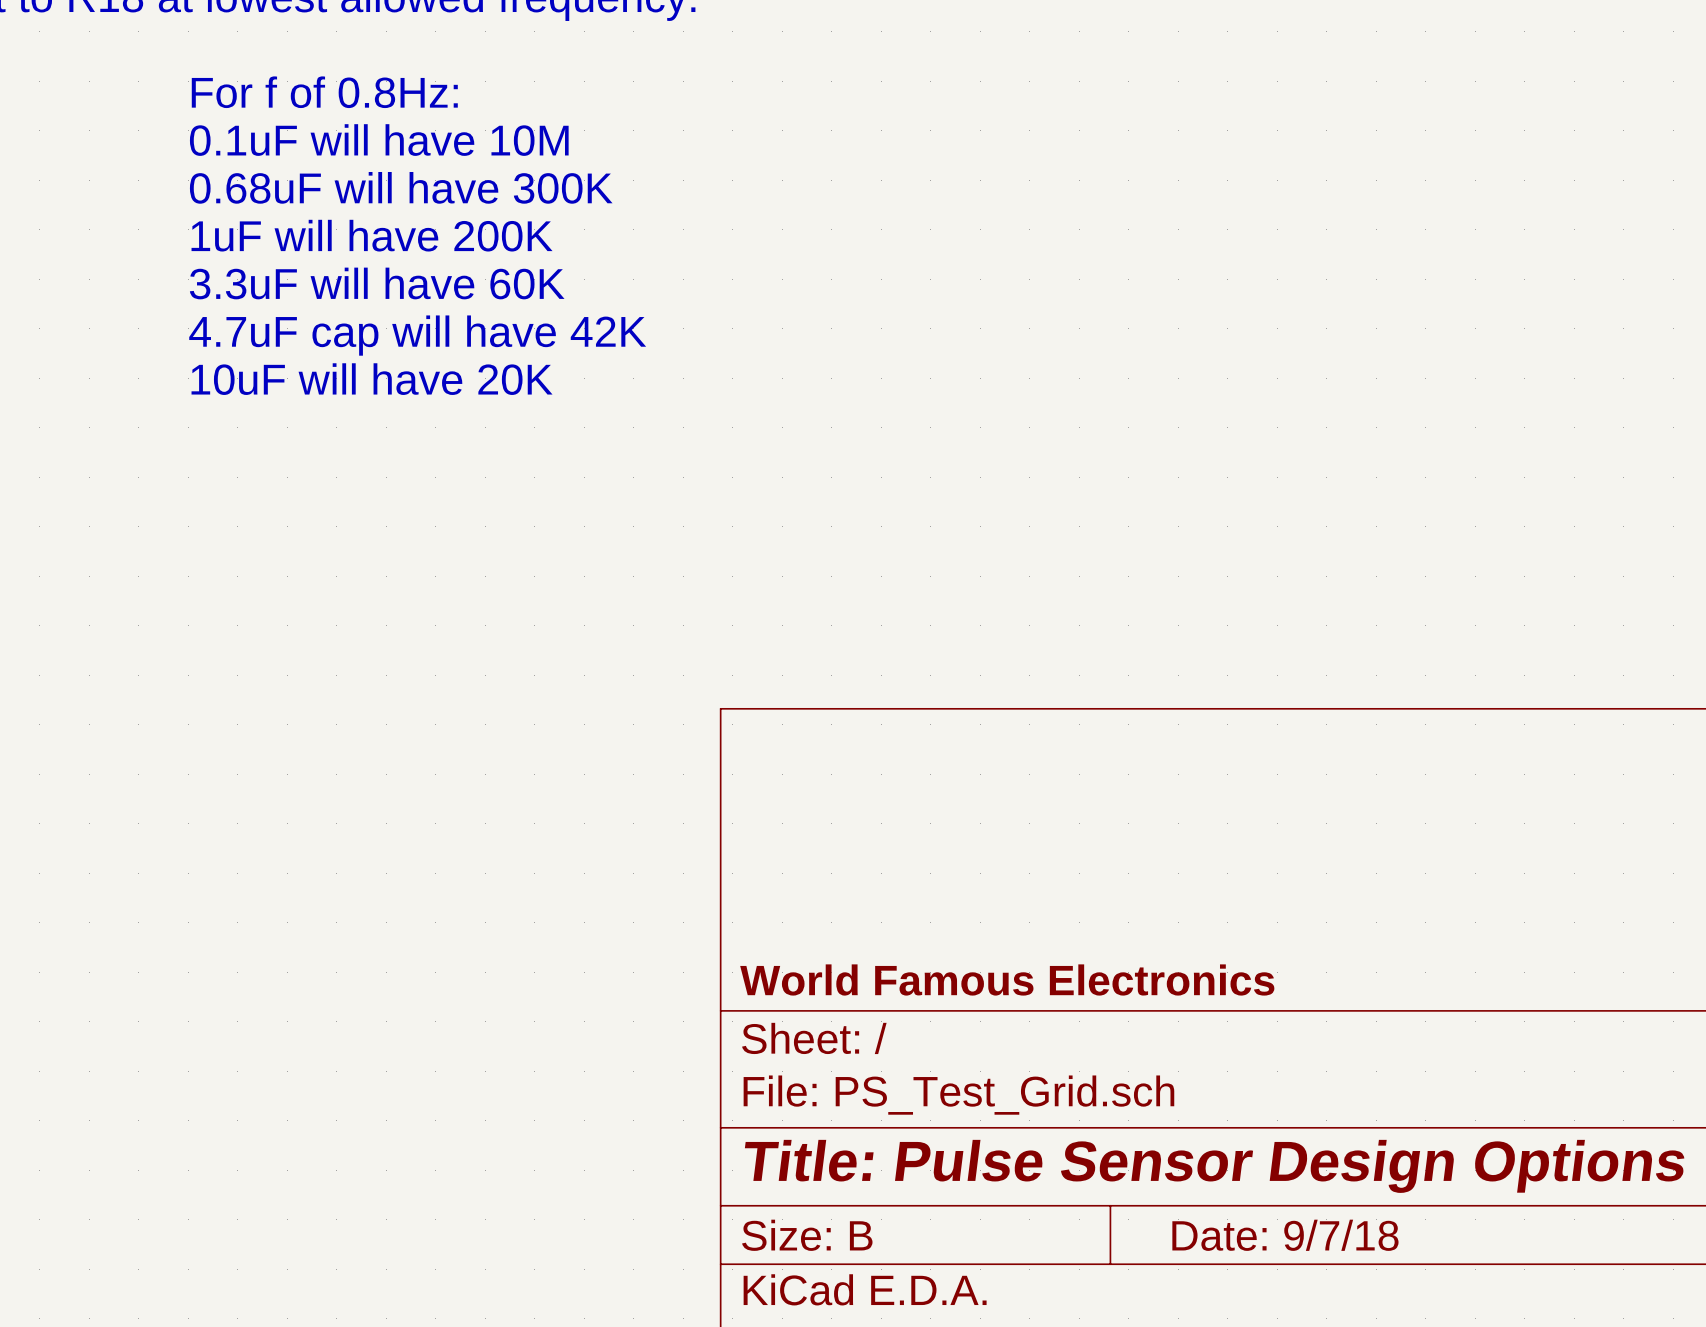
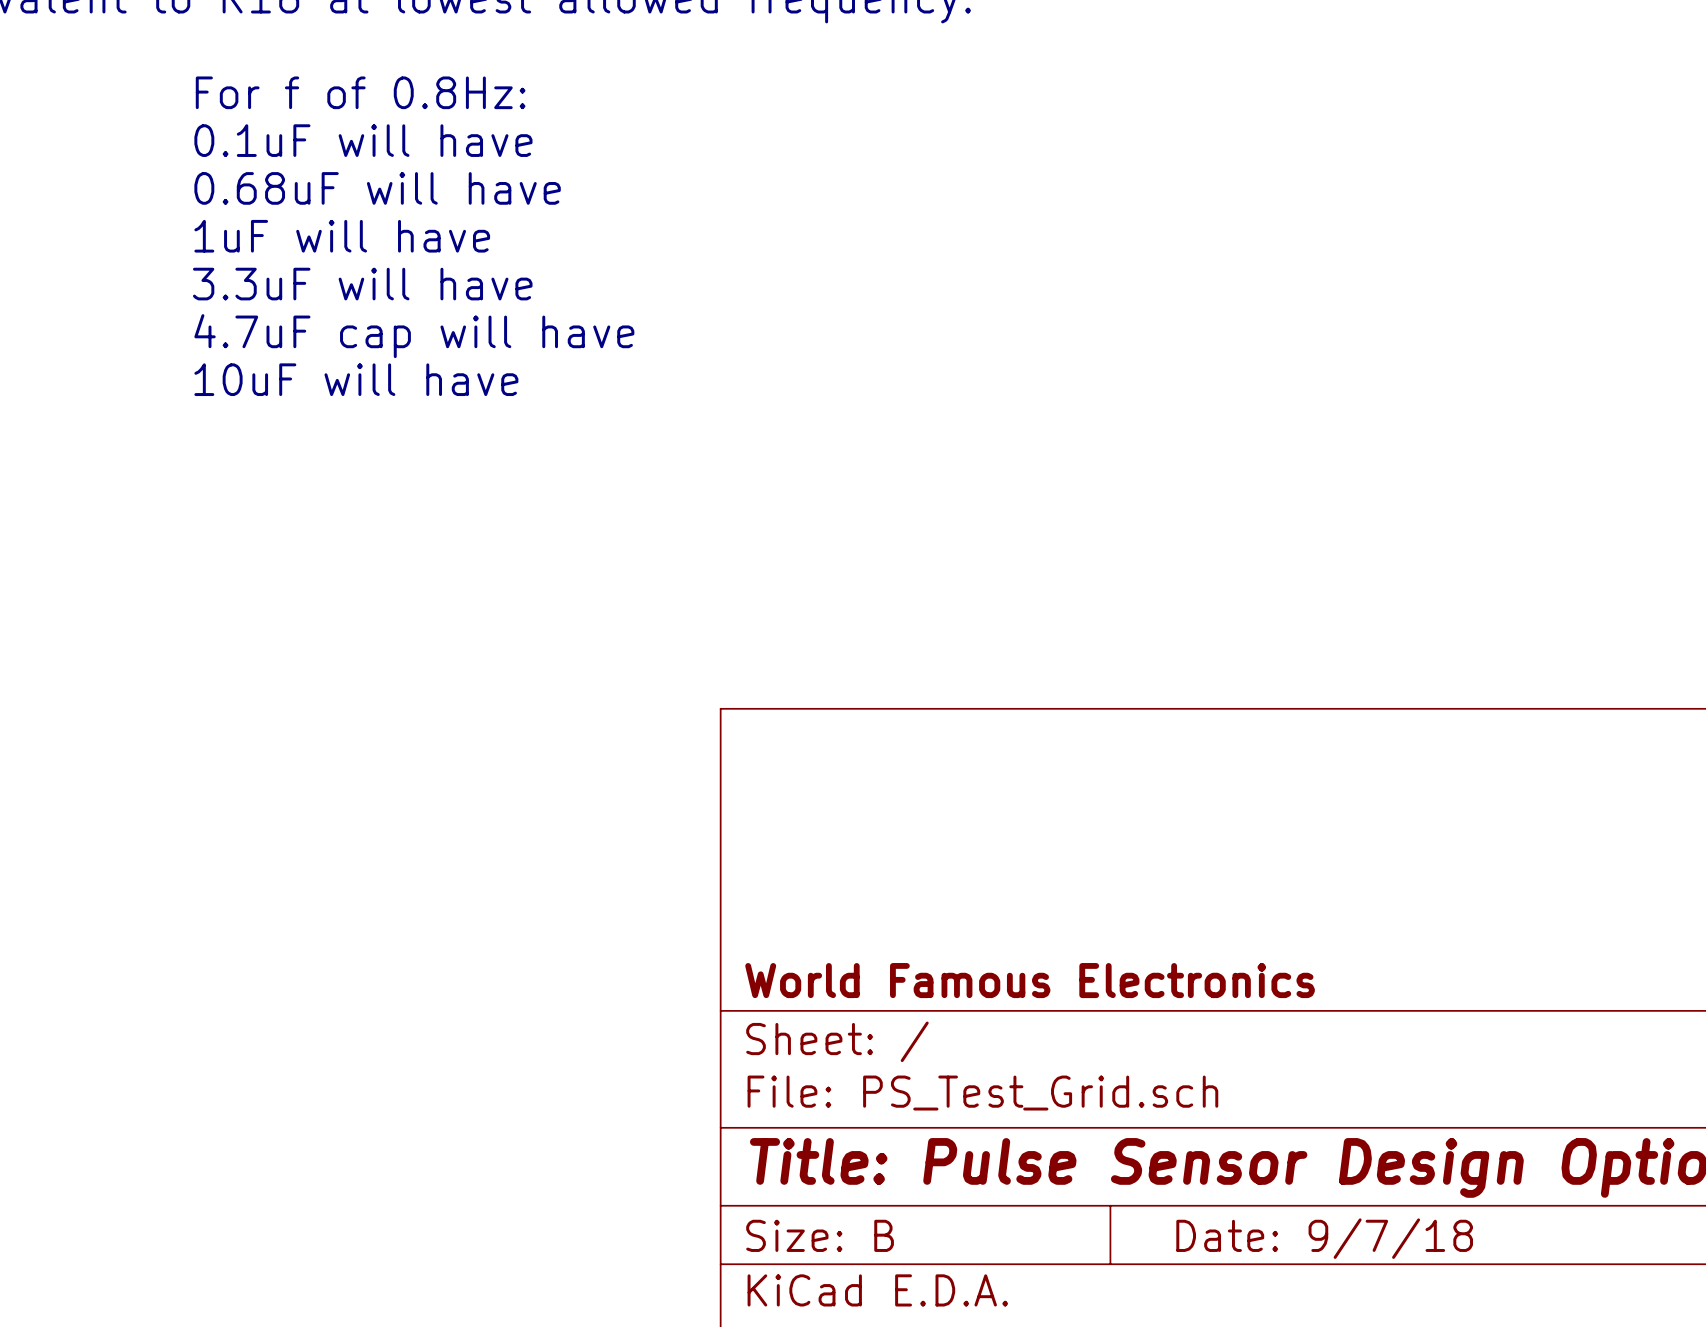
text: 0.1uF will have 10M (379, 140) -> 0.1uF will have (363, 140)
text: 0.68uF will have 300K (401, 187) -> 0.68uF will have (377, 188)
text: 1uF will have 200K (372, 235) -> 1uF will have (342, 236)
text: 3.3uF will have 60K (377, 283) -> 3.3uF will have (362, 284)
text: 4.7uF cap will have 42K (417, 335) -> 4.7uF cap will have (414, 336)
text: 10uF will have 20K (372, 379) -> 10uF will have (356, 379)

